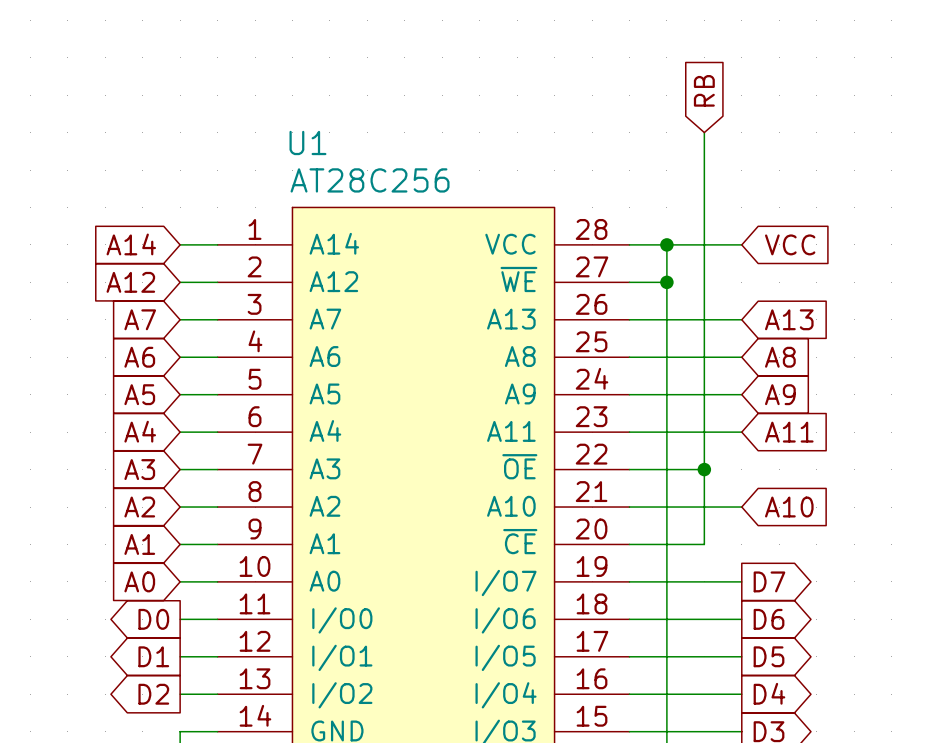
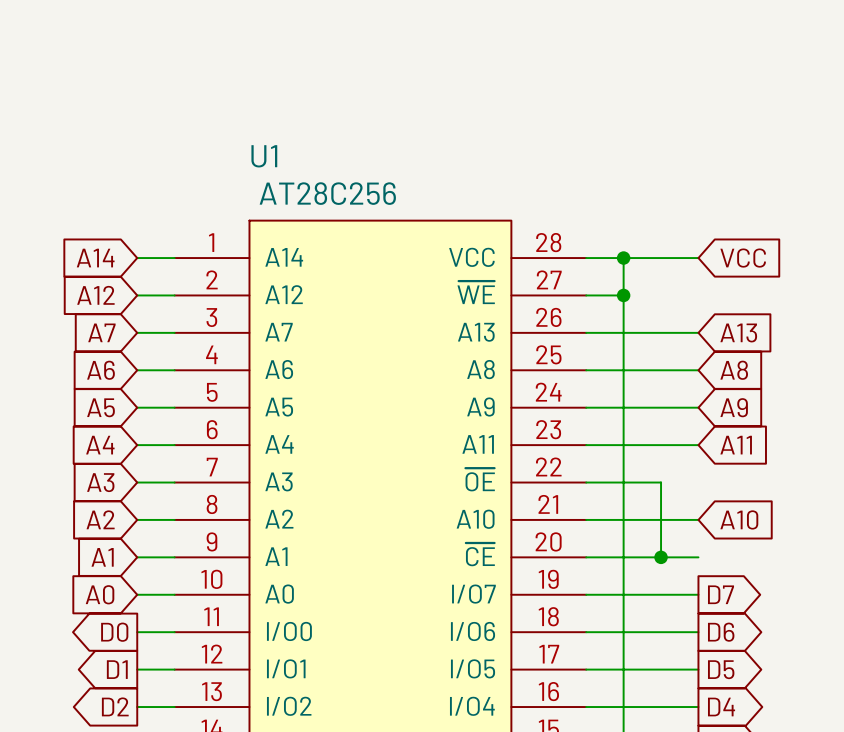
global label: RB (704, 90) -> none
wire: (704, 132) (704, 469) -> none
junction position: (704, 469) -> (661, 557)
wire: none -> (661, 557) (698, 557)

